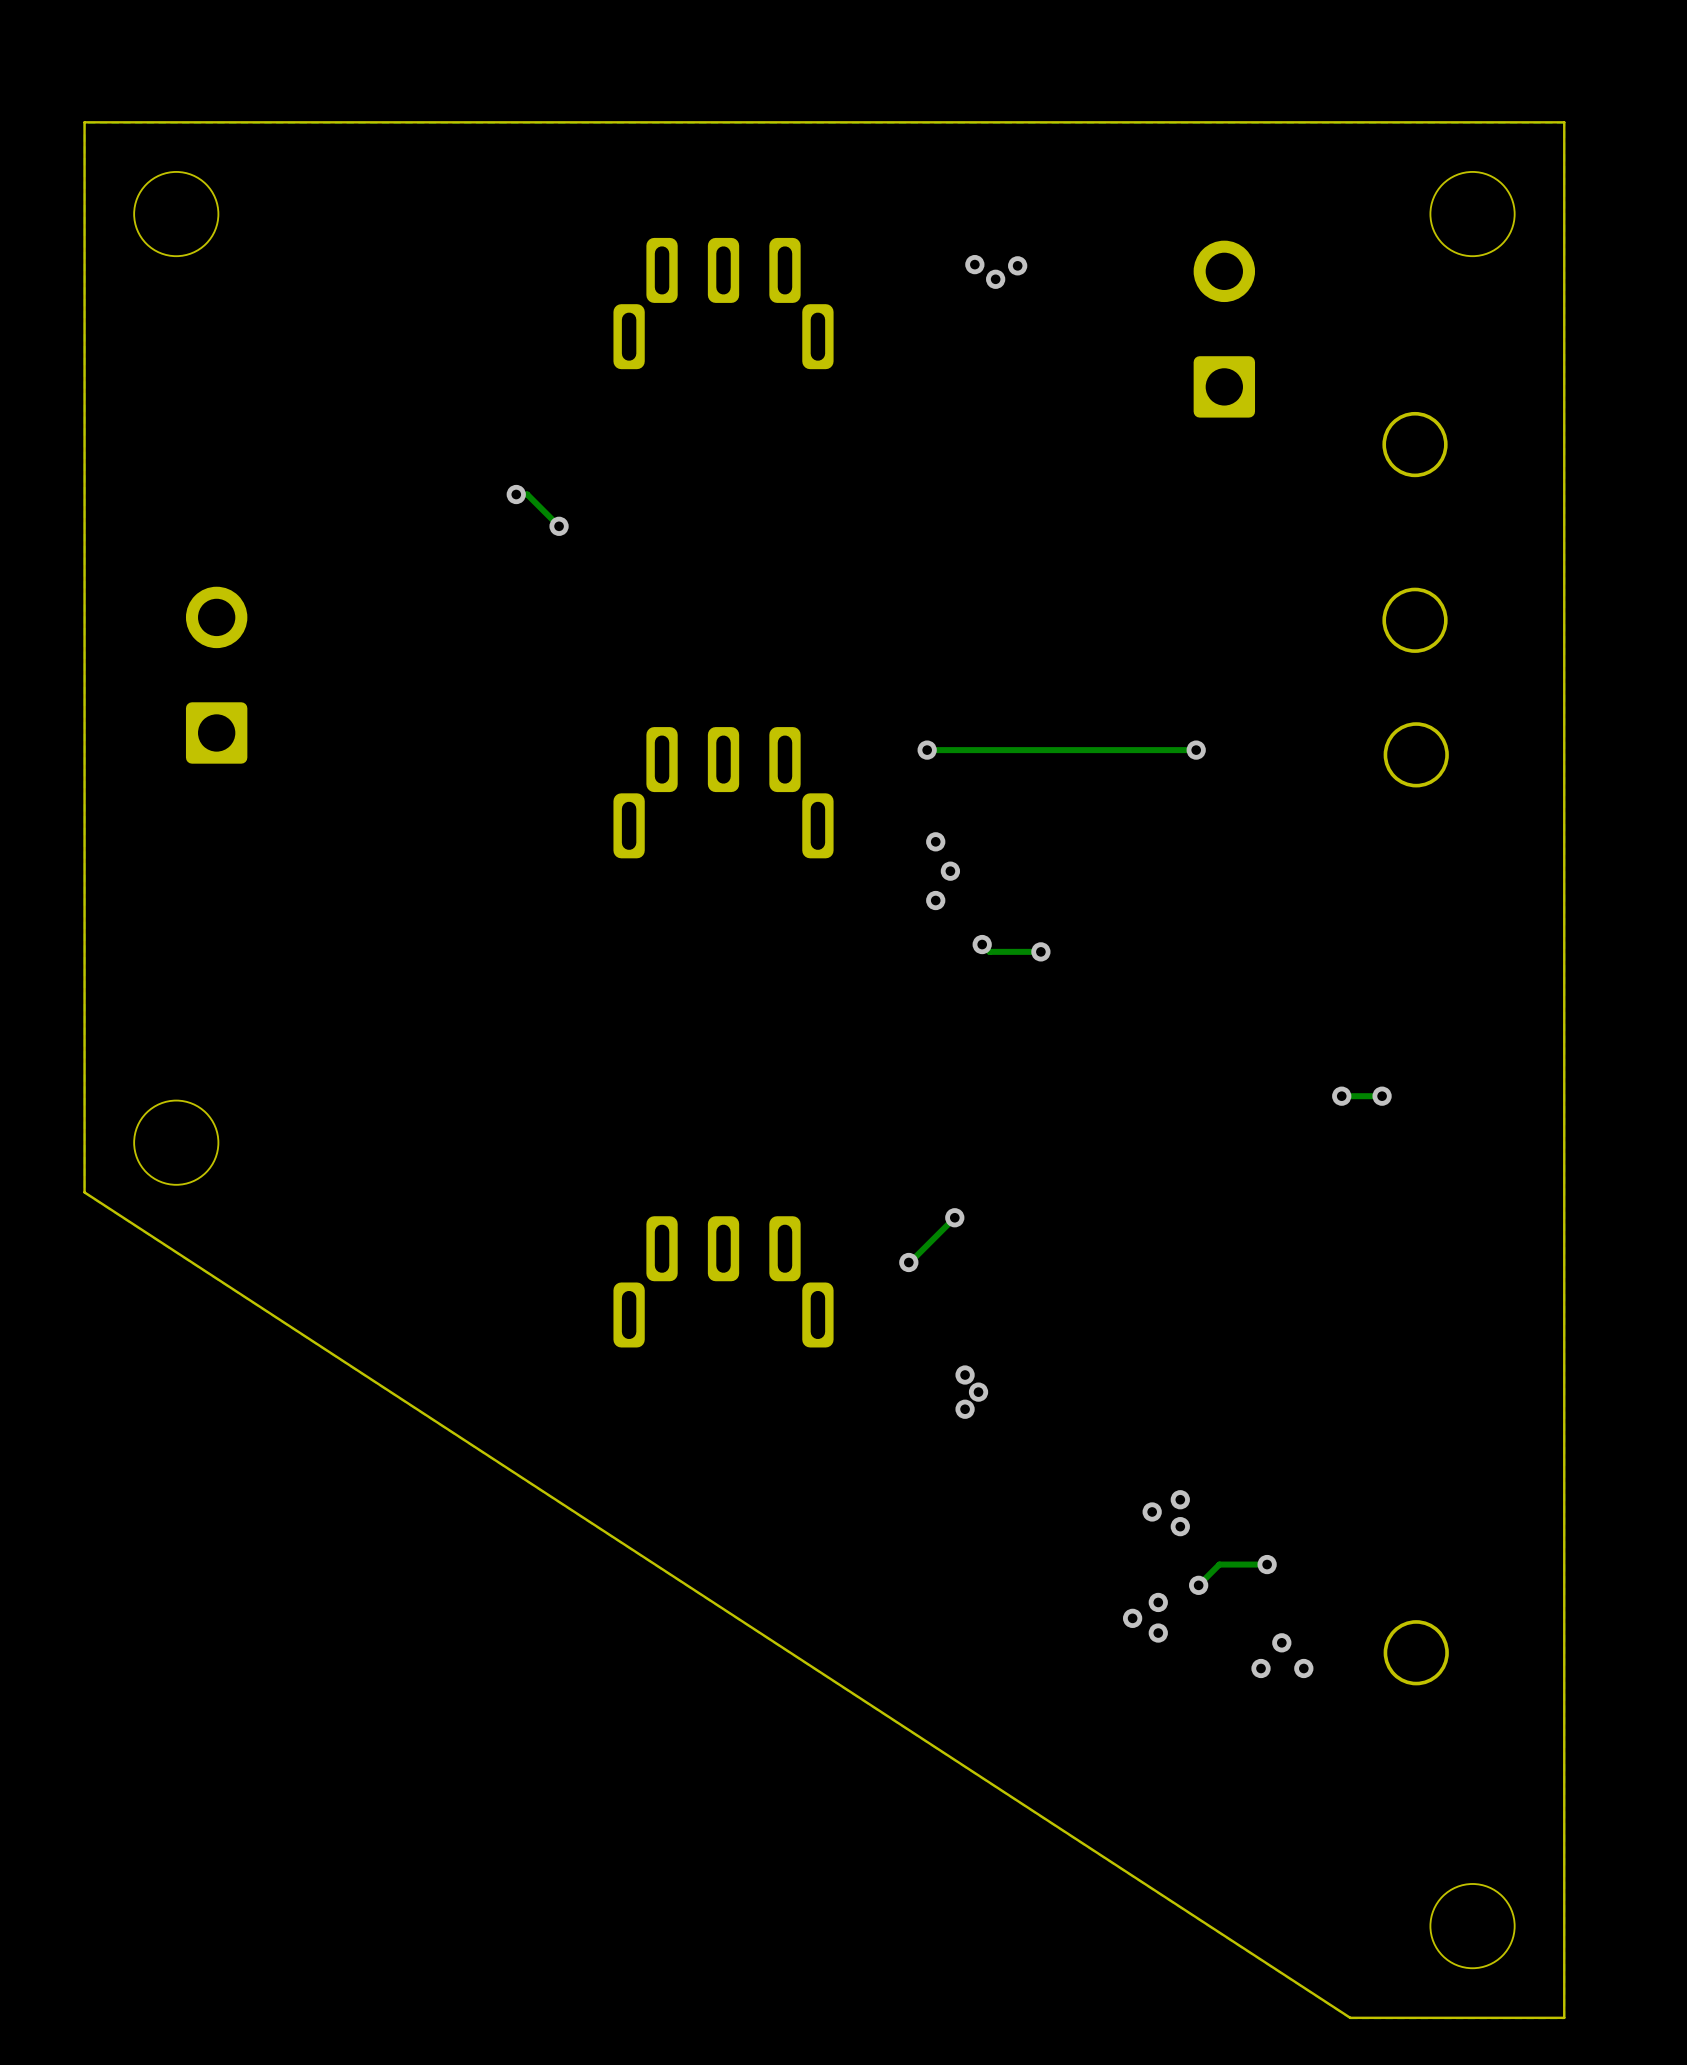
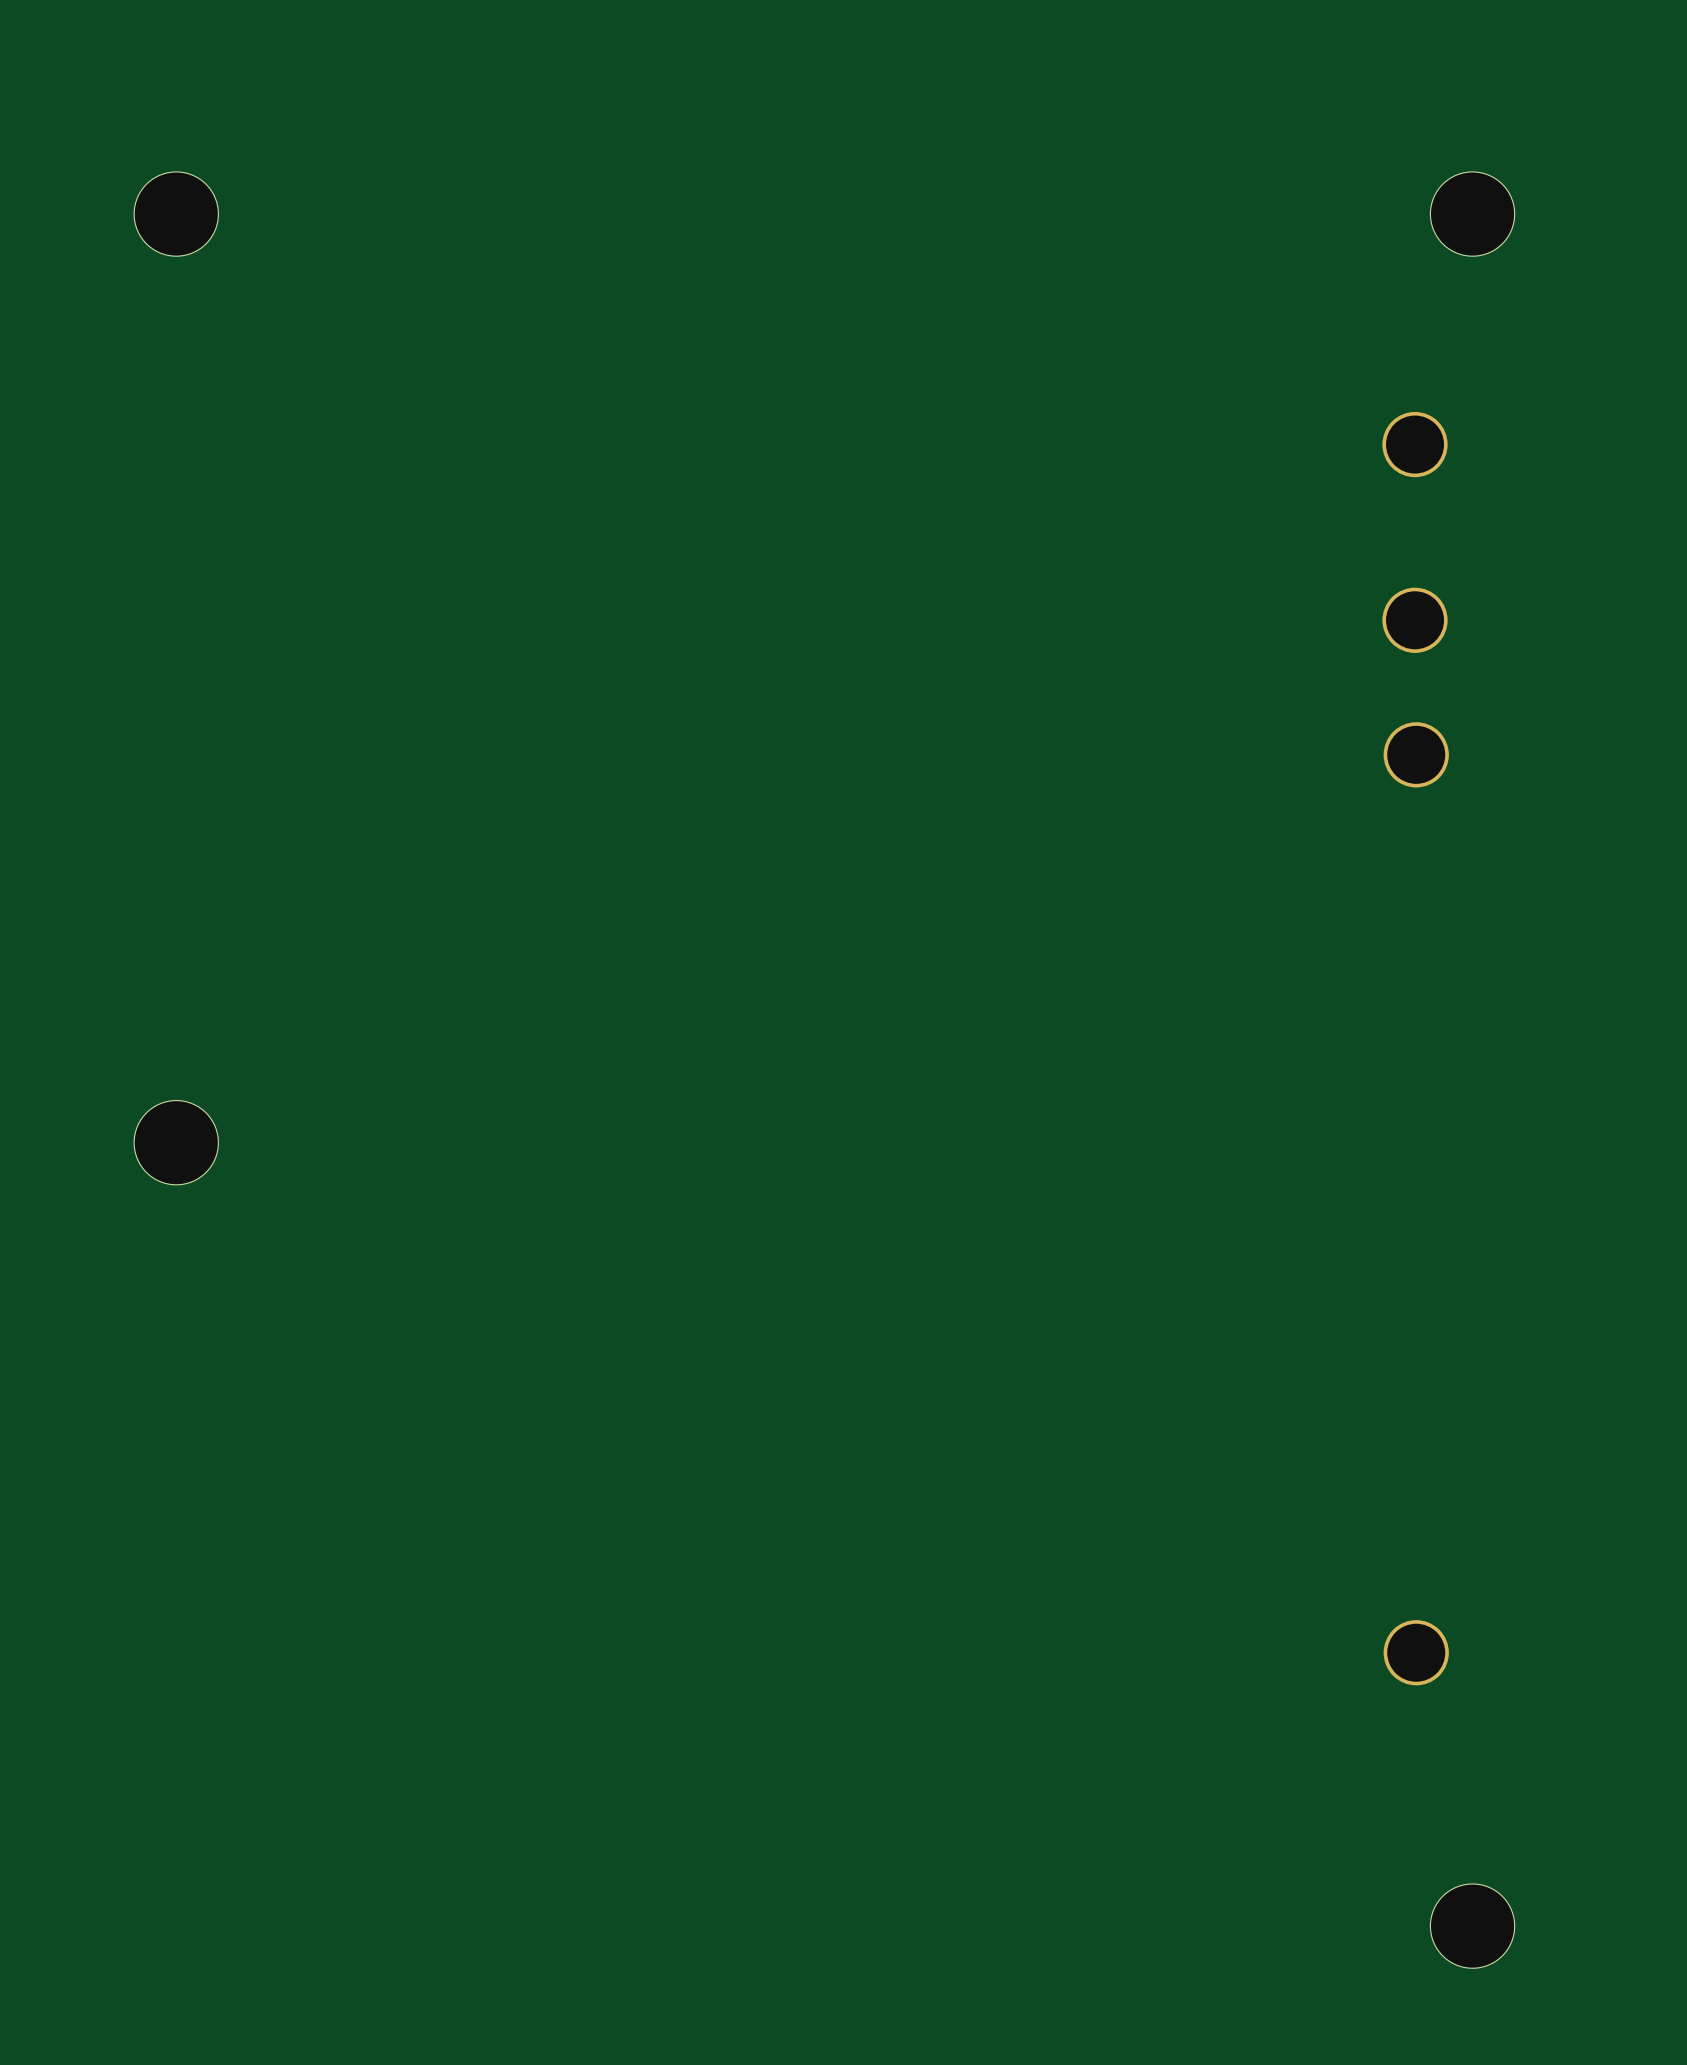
board edge: (1564, 122) (84, 122) (84, 1192) (1350, 2017) (1564, 2017) (1564, 122) -> none
via: (974, 264) -> none
via: (1017, 265) -> none
via: (995, 279) -> none
part: (723, 303) -> none
part: (1224, 329) -> none
track: (516, 494) (527, 494) (559, 526) -> none
via: (516, 494) -> none
via: (559, 526) -> none
part: (216, 675) -> none
via: (927, 750) -> none
track: (1196, 750) (927, 750) -> none
via: (1196, 750) -> none
part: (723, 792) -> none
via: (935, 841) -> none
via: (950, 871) -> none
via: (935, 900) -> none
track: (982, 944) (989, 951) (1040, 951) -> none
via: (982, 944) -> none
via: (1040, 951) -> none
via: (1341, 1096) -> none
track: (1382, 1096) (1341, 1096) -> none
via: (1382, 1096) -> none
track: (954, 1217) (908, 1262) -> none
via: (954, 1217) -> none
via: (908, 1262) -> none
part: (723, 1281) -> none
via: (965, 1375) -> none
via: (978, 1392) -> none
via: (965, 1409) -> none
via: (1180, 1499) -> none
via: (1152, 1511) -> none
via: (1180, 1526) -> none
track: (1267, 1564) (1219, 1564) (1198, 1585) -> none
via: (1267, 1564) -> none
via: (1198, 1585) -> none
via: (1158, 1602) -> none
via: (1132, 1618) -> none
via: (1158, 1633) -> none
via: (1281, 1642) -> none
via: (1261, 1668) -> none
via: (1303, 1668) -> none

